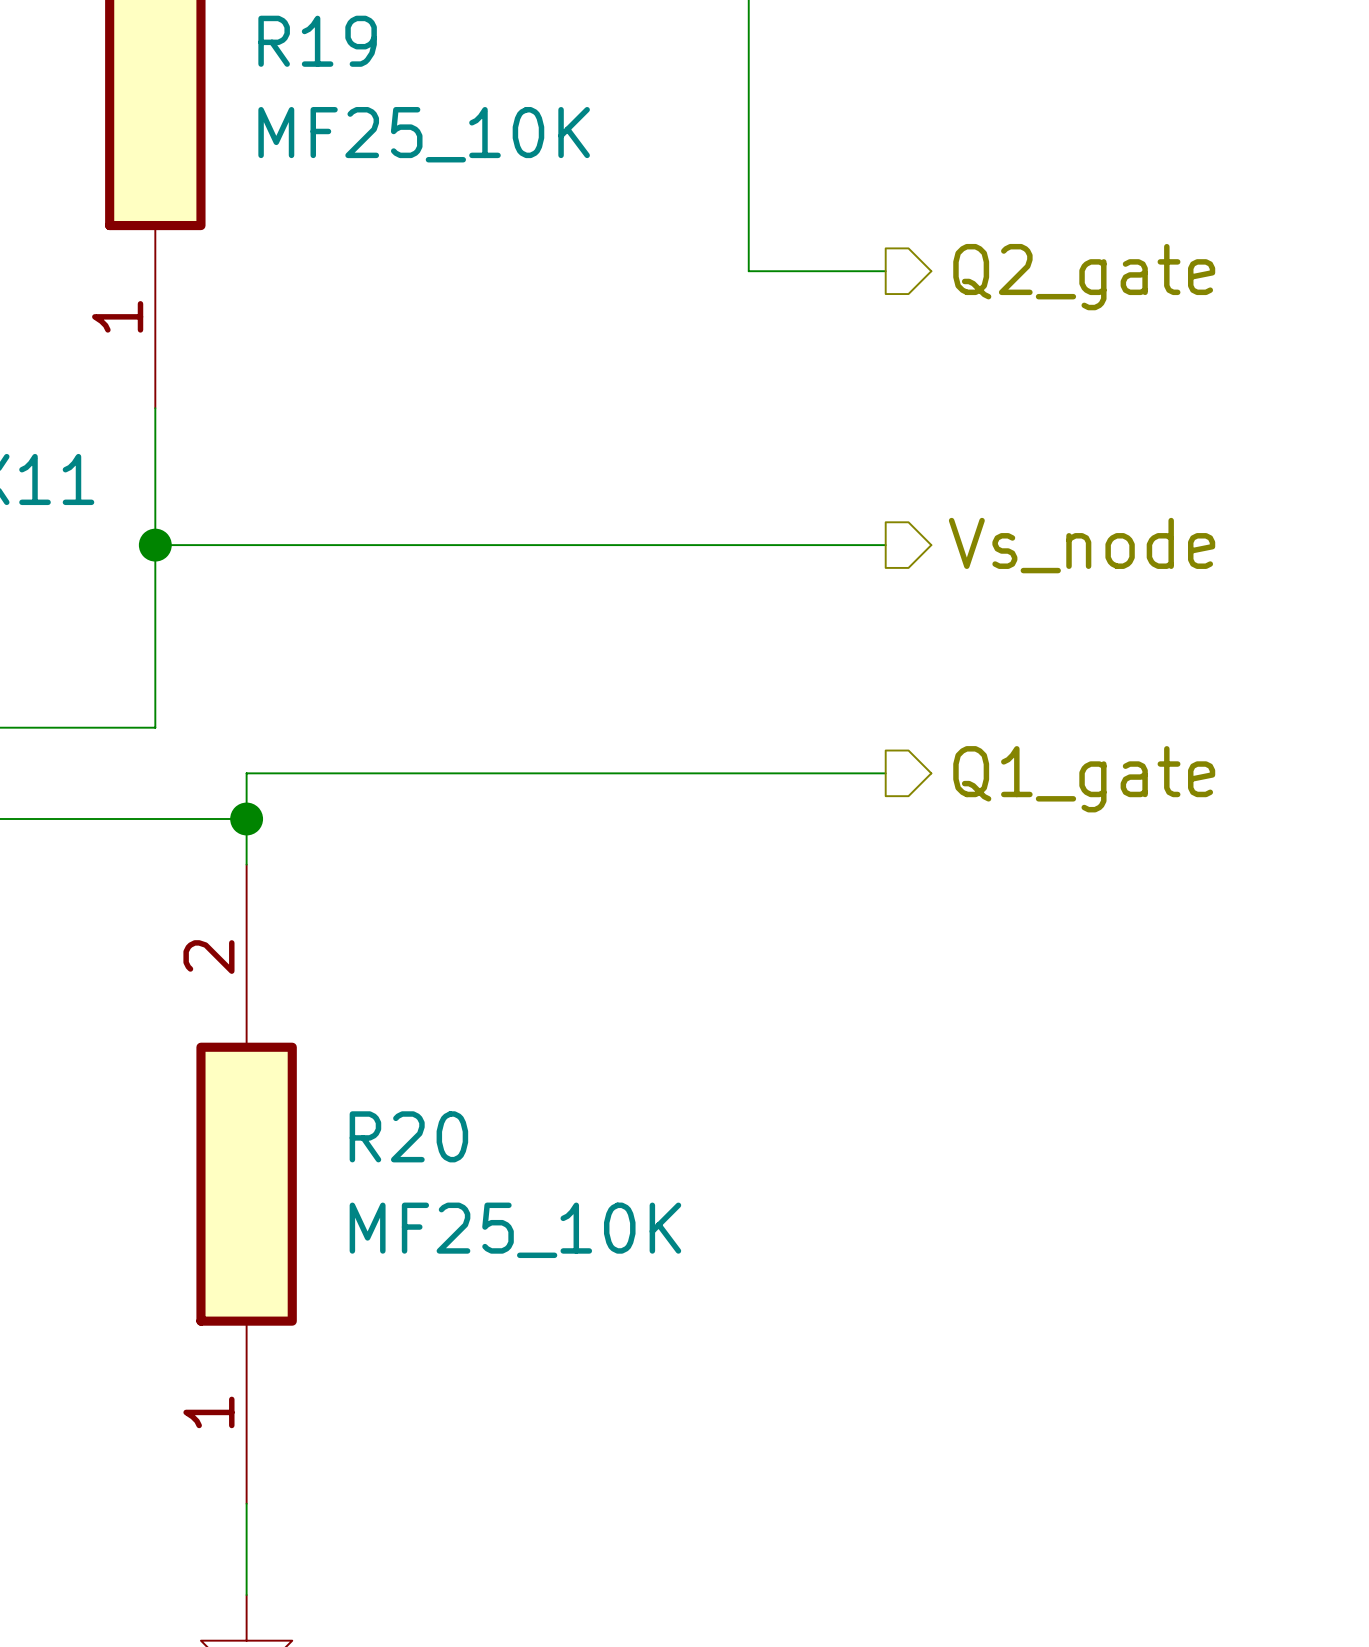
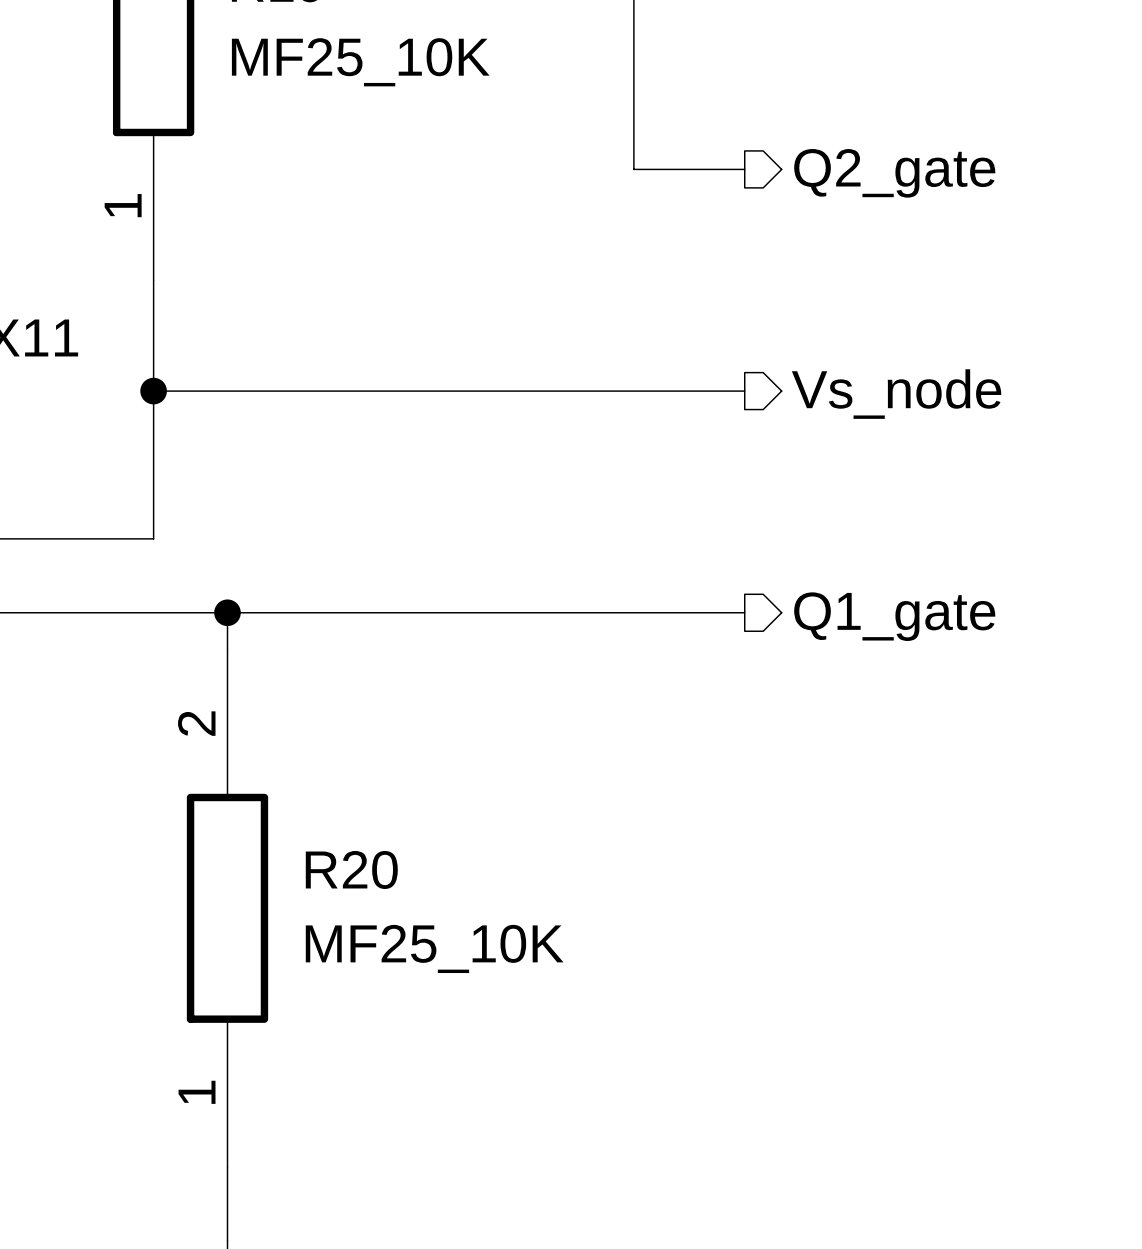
wire: (885, 773) (246, 773) (246, 819) -> (744, 612) (227, 612)
hierarchical label position: Q1_gate (1084, 779) -> Q1_gate (894, 616)

